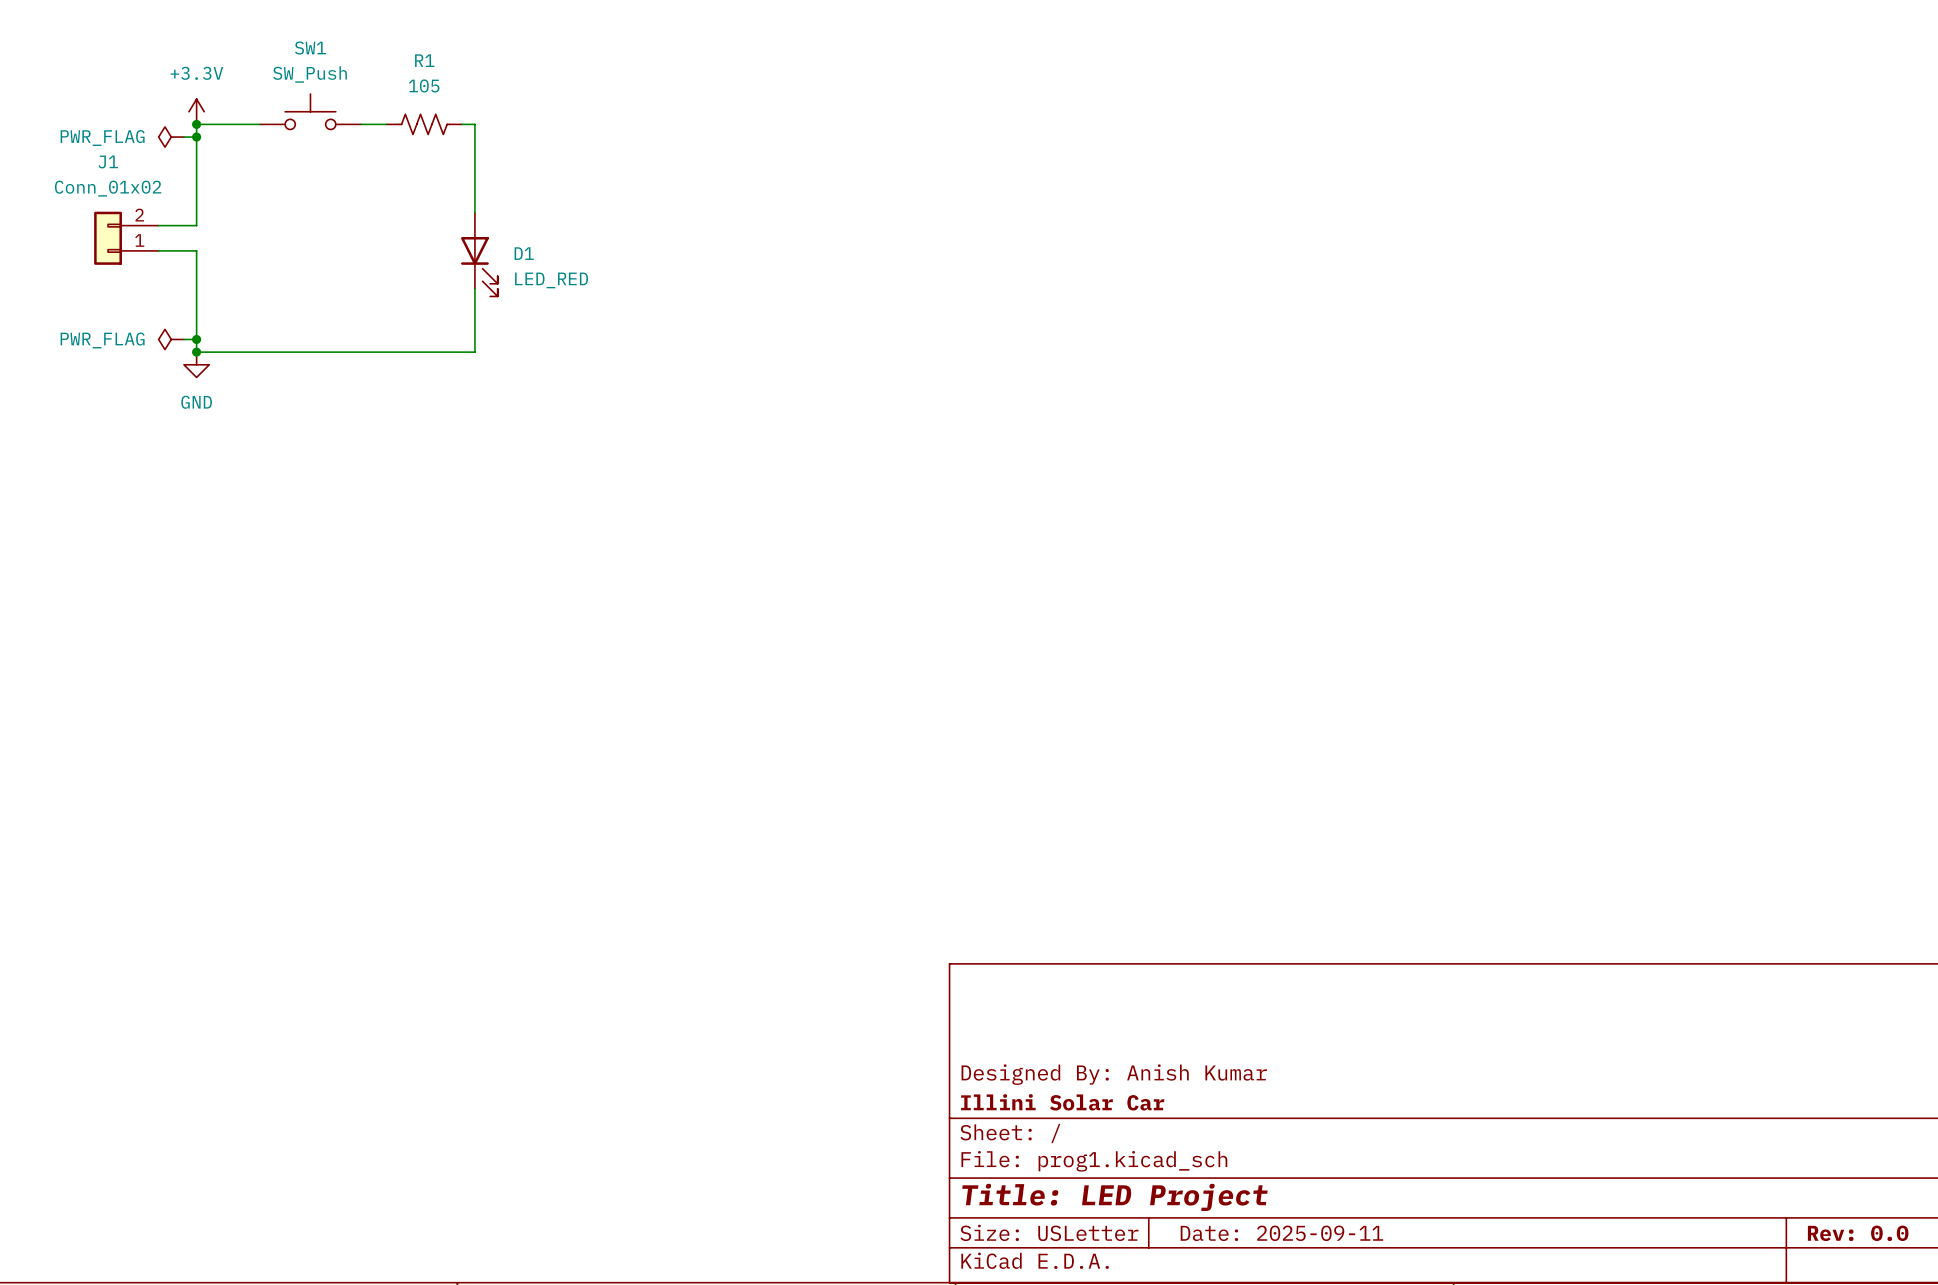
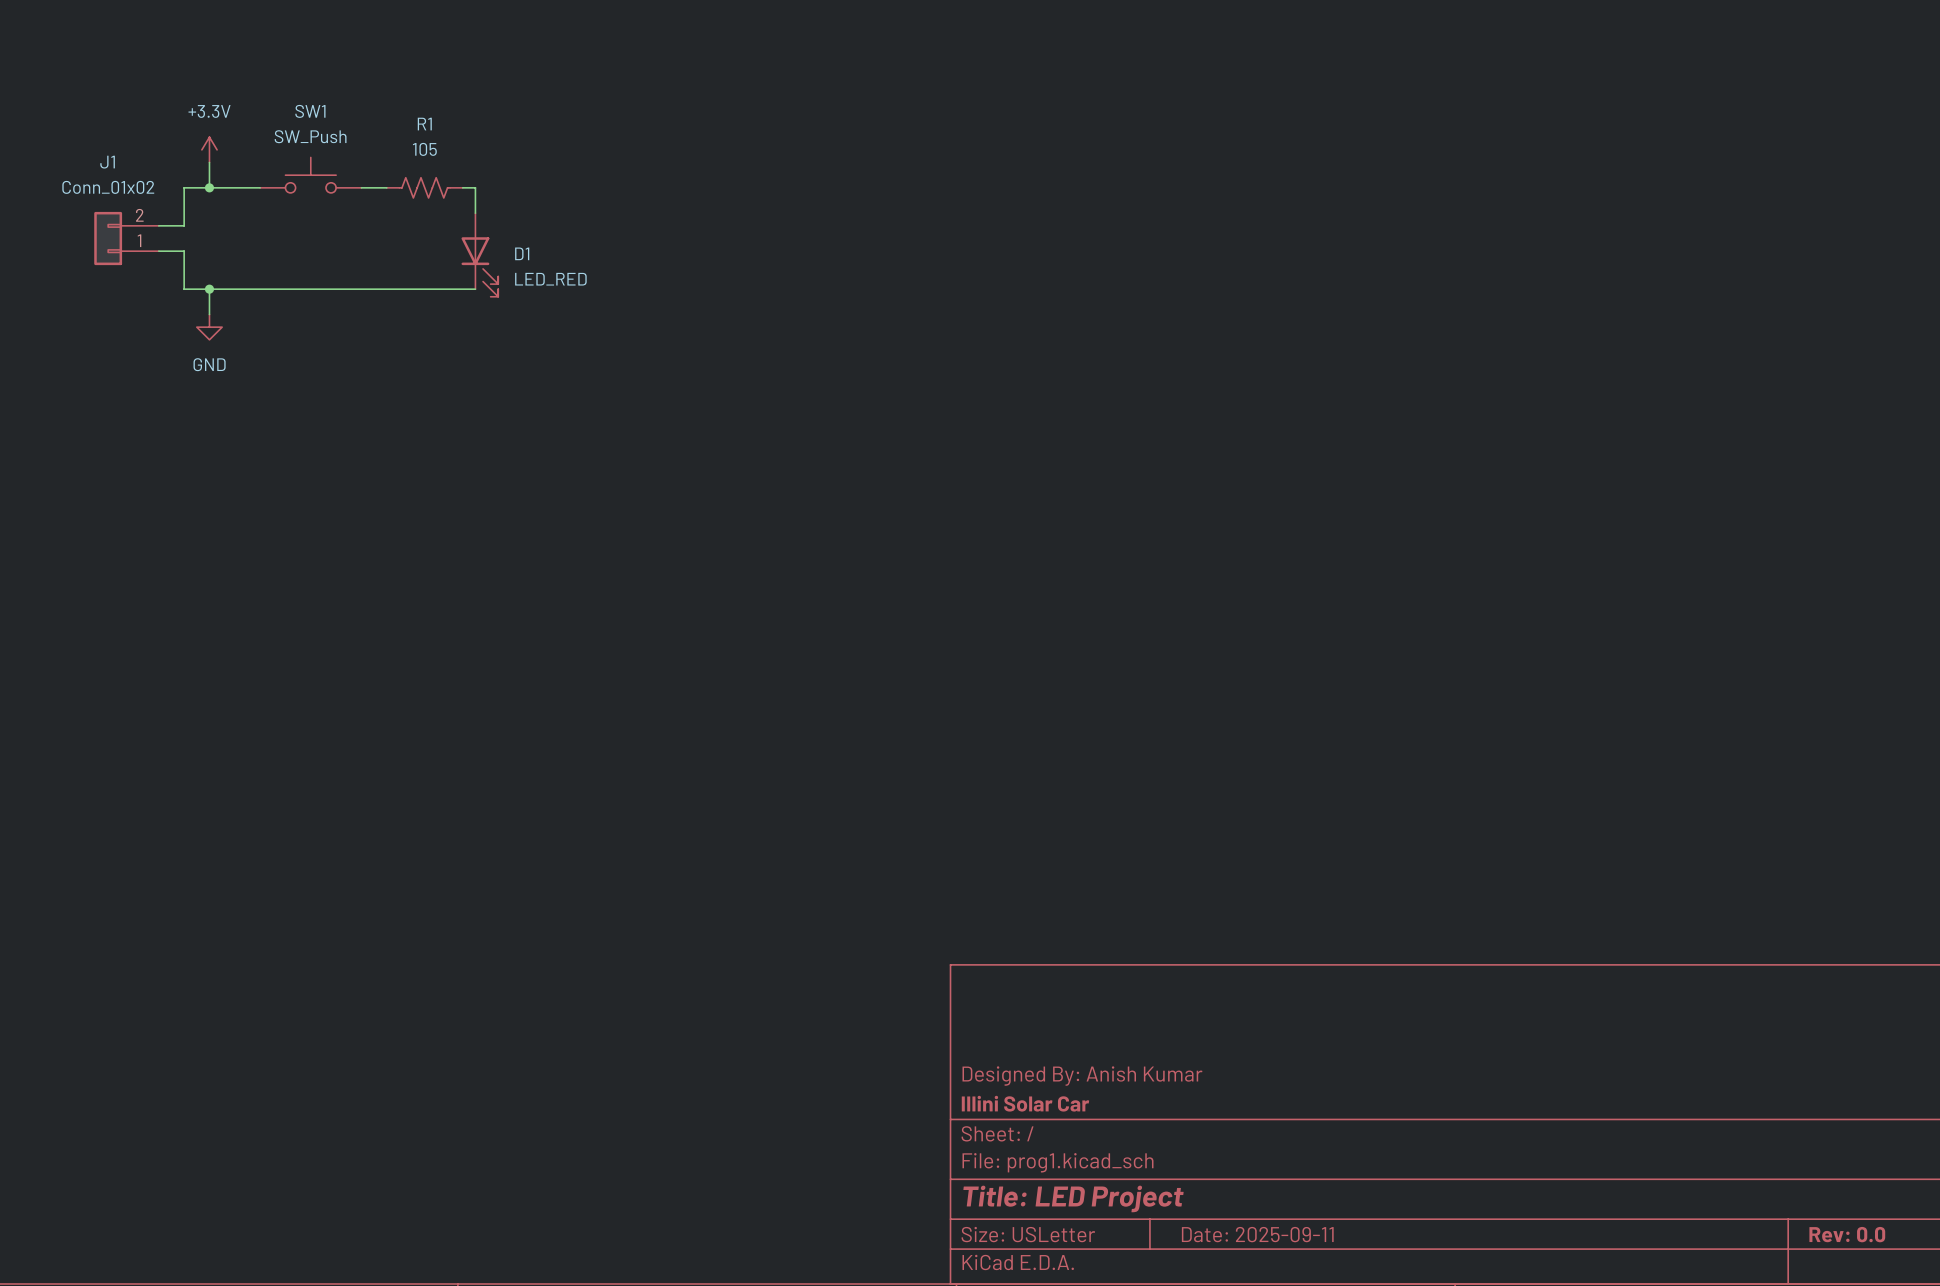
power symbol position: +3.3V (196, 111) -> +3.3V (209, 149)
SW1 position: (310, 111) -> (310, 175)
junction: (196, 124) -> none
wire: (259, 124) (196, 124) (196, 225) (183, 225) -> (260, 187) (184, 187) (184, 225)
wire: (361, 124) (386, 124) -> (361, 187) (386, 187)
R1 position: (424, 124) -> (424, 187)
wire: (462, 124) (474, 124) (474, 187) -> (462, 187) (475, 187)
power symbol: PWR_FLAG (171, 137) -> none
wire: (183, 137) (196, 137) -> none
junction: (196, 137) -> none
wire: none -> (209, 162) (209, 187)
junction: none -> (209, 187)
wire: (183, 250) (196, 250) (196, 352) (474, 352) (474, 288) -> (184, 251) (184, 289) (475, 289)
wire: none -> (209, 289) (209, 314)
junction: none -> (209, 289)
power symbol: PWR_FLAG (171, 339) -> none
wire: (183, 339) (196, 339) -> none
junction: (196, 339) -> none
junction: (196, 352) -> none
power symbol position: GND (196, 364) -> GND (209, 327)

